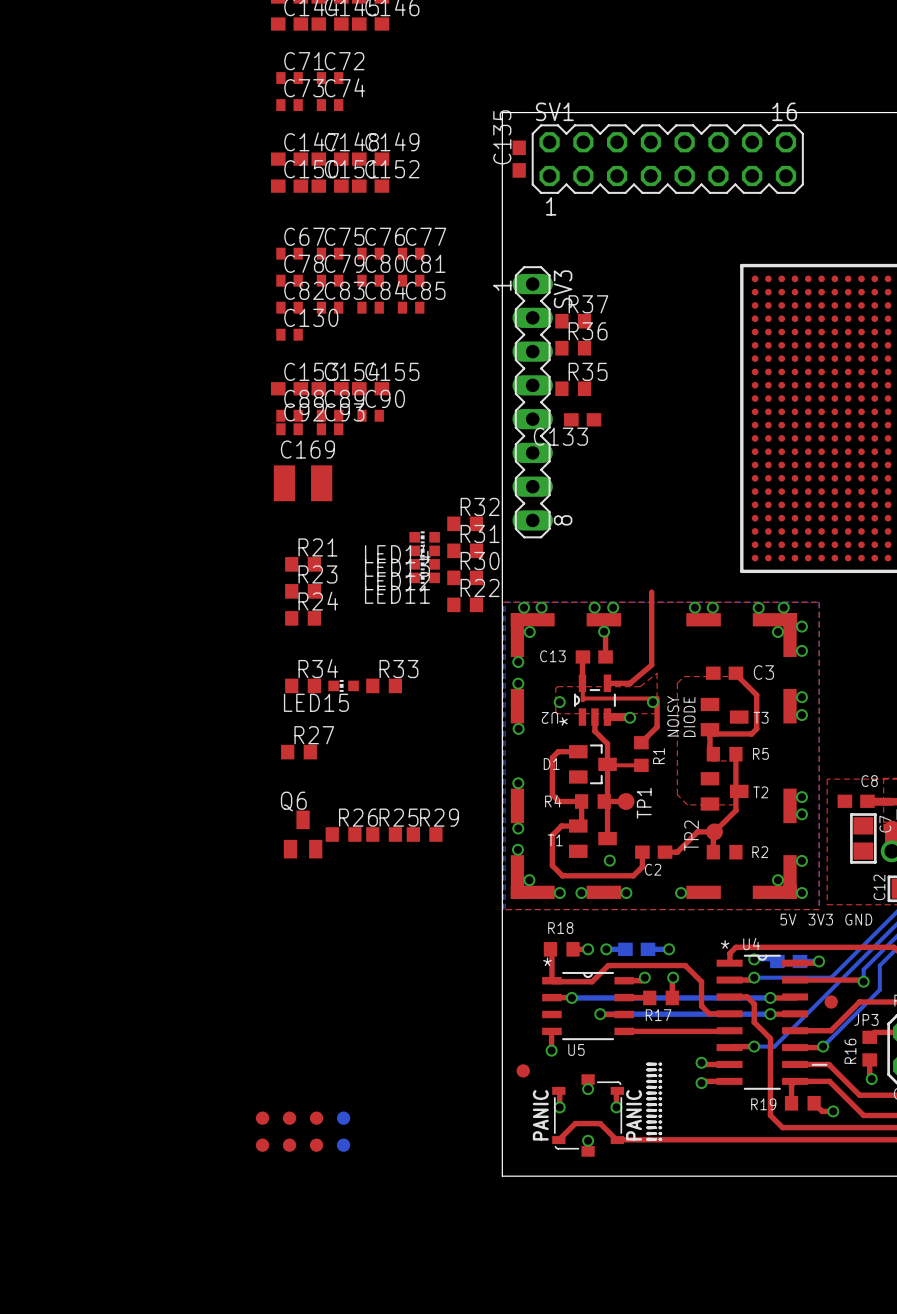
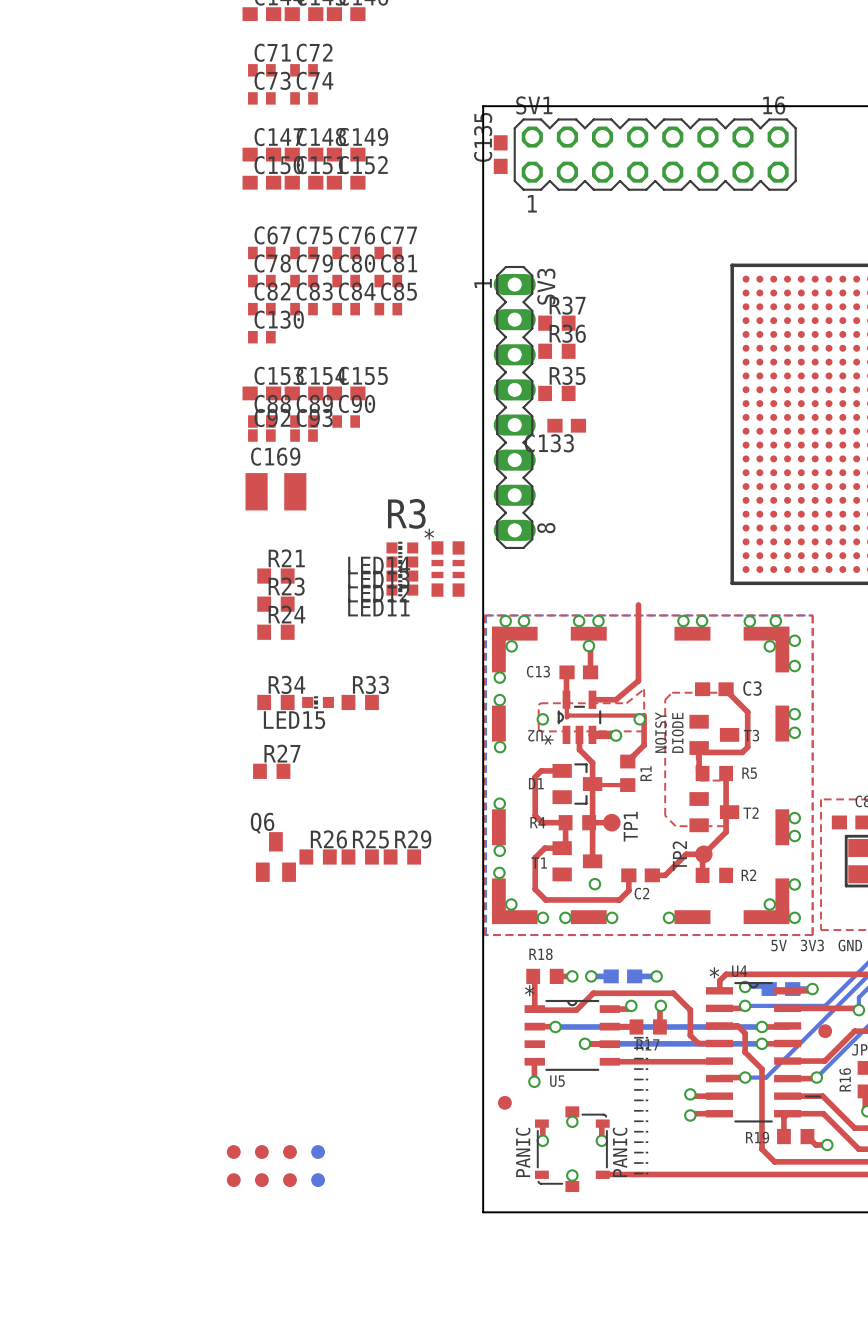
R32: (465, 523) -> none
R31: (465, 550) -> none
R3: none -> (448, 569)
R30: (465, 577) -> none
R22: (465, 604) -> none
top track: (558, 1140) (575, 1123) (600, 1123) (616, 1140) -> none

